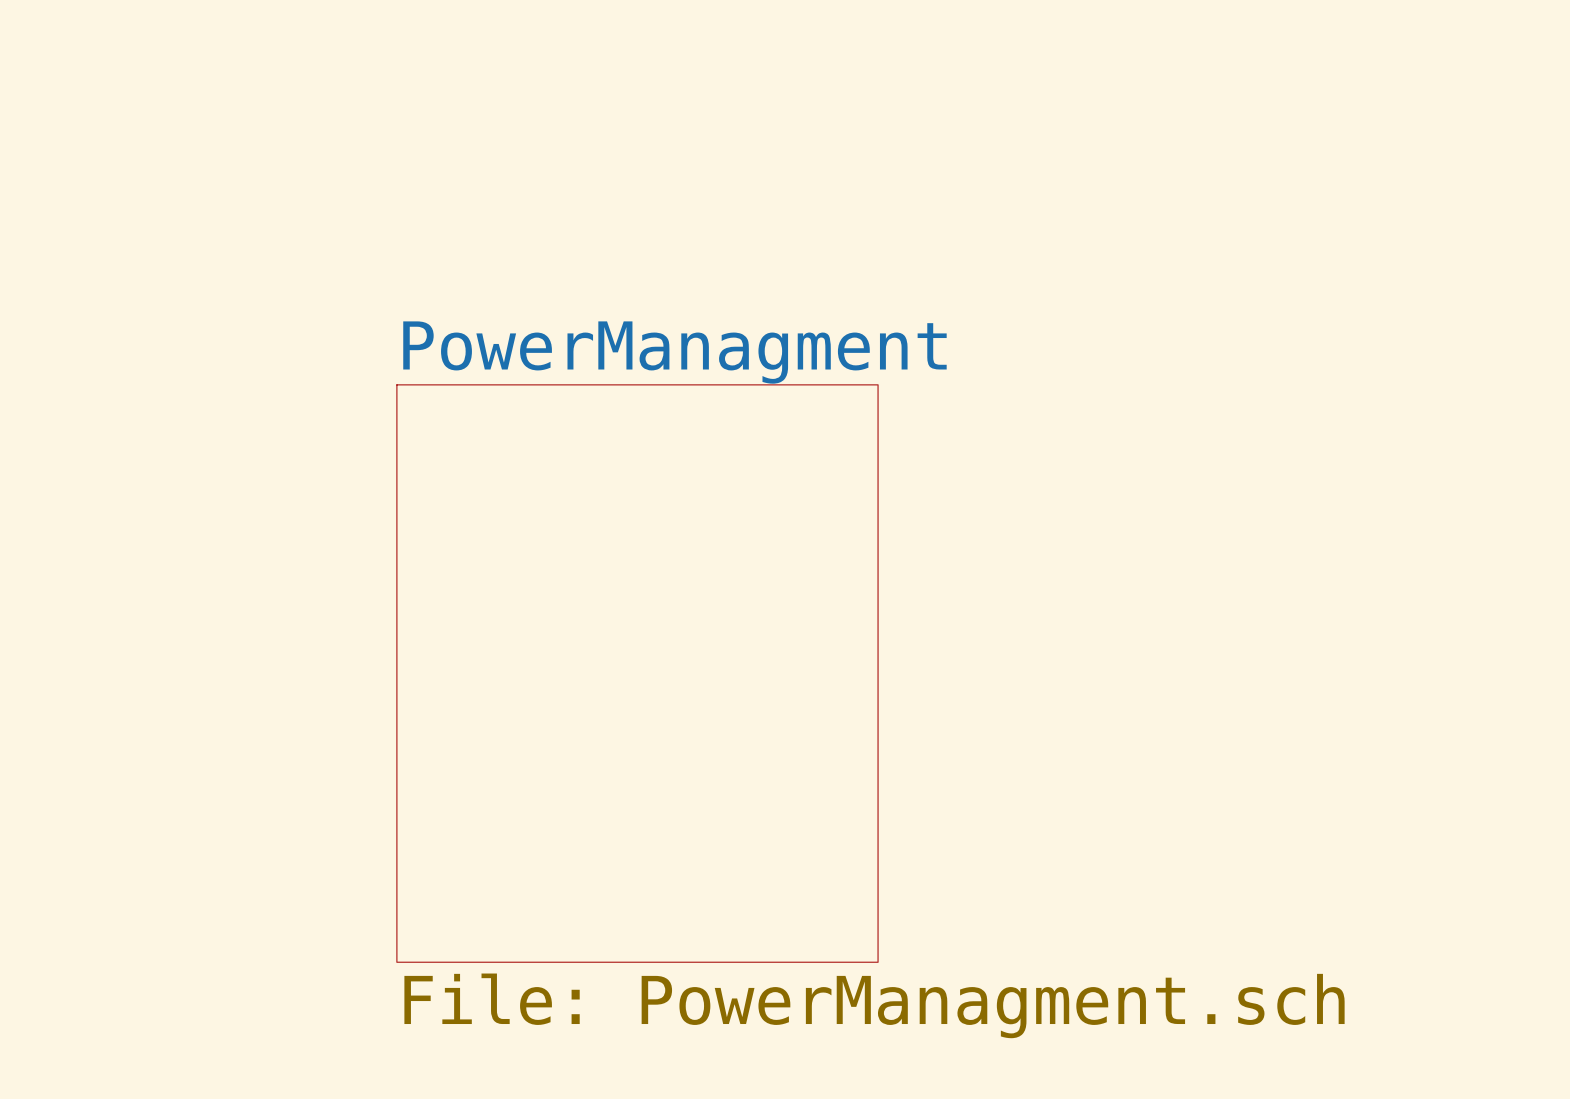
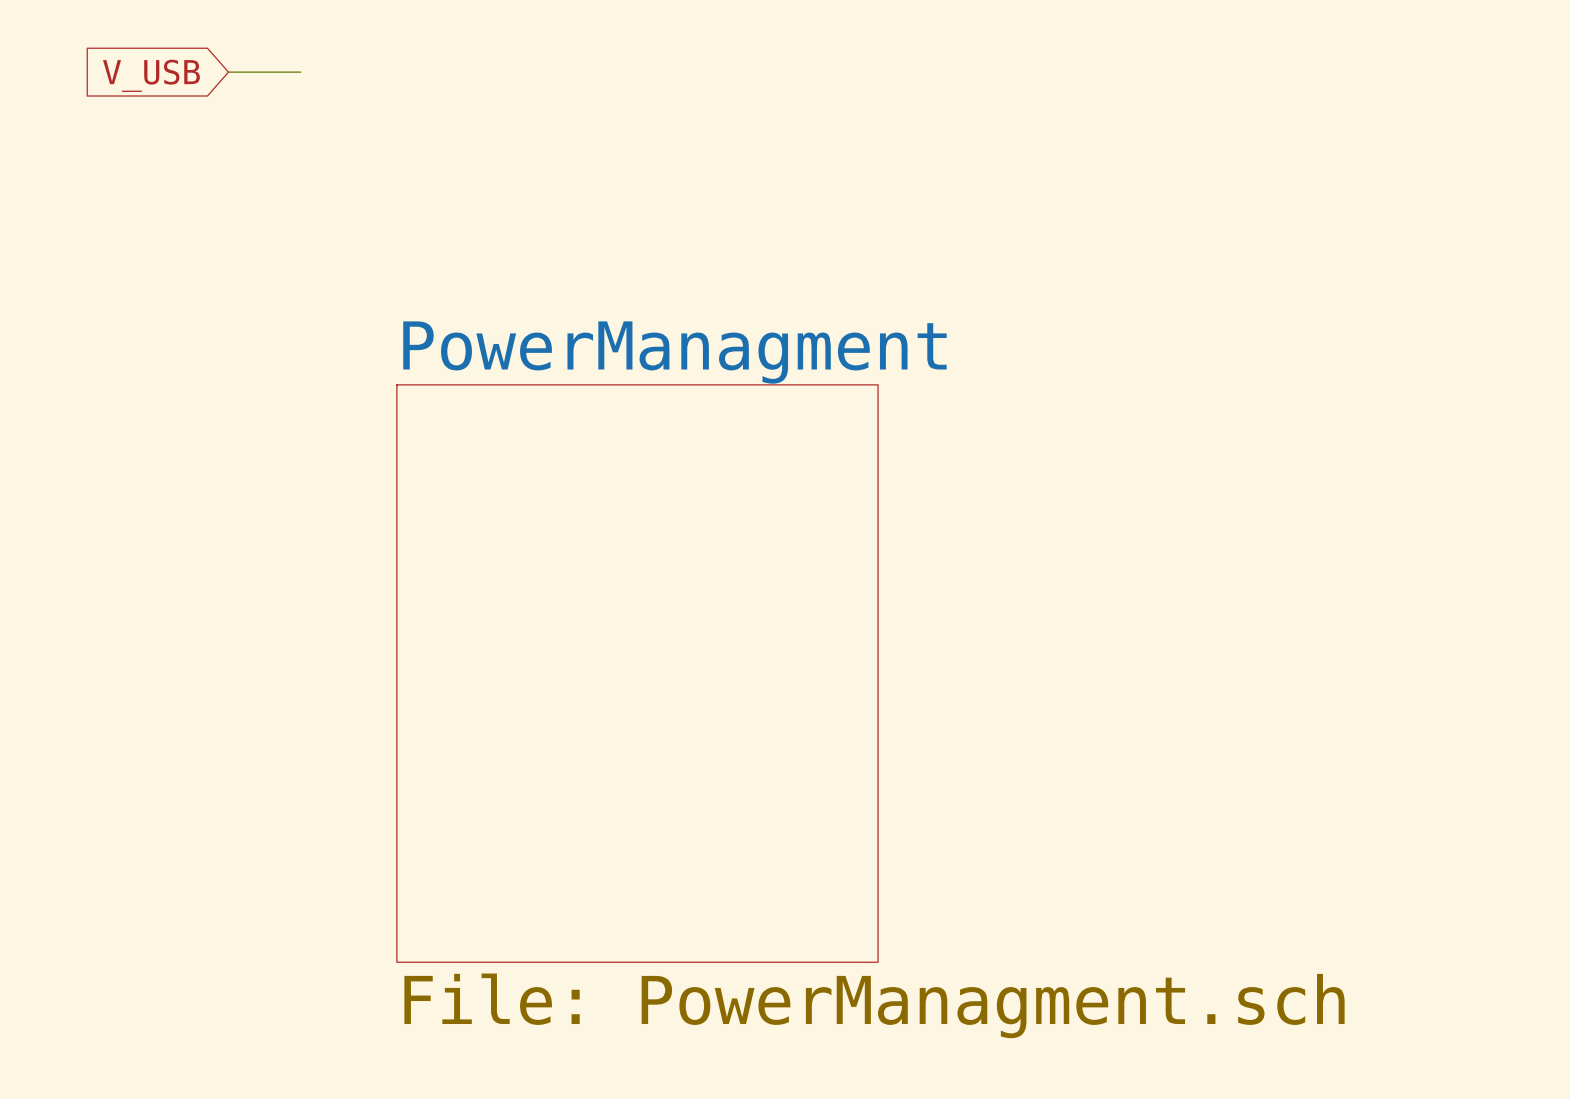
wire: none -> (228, 72) (300, 72)
global label: none -> V_USB (151, 75)

